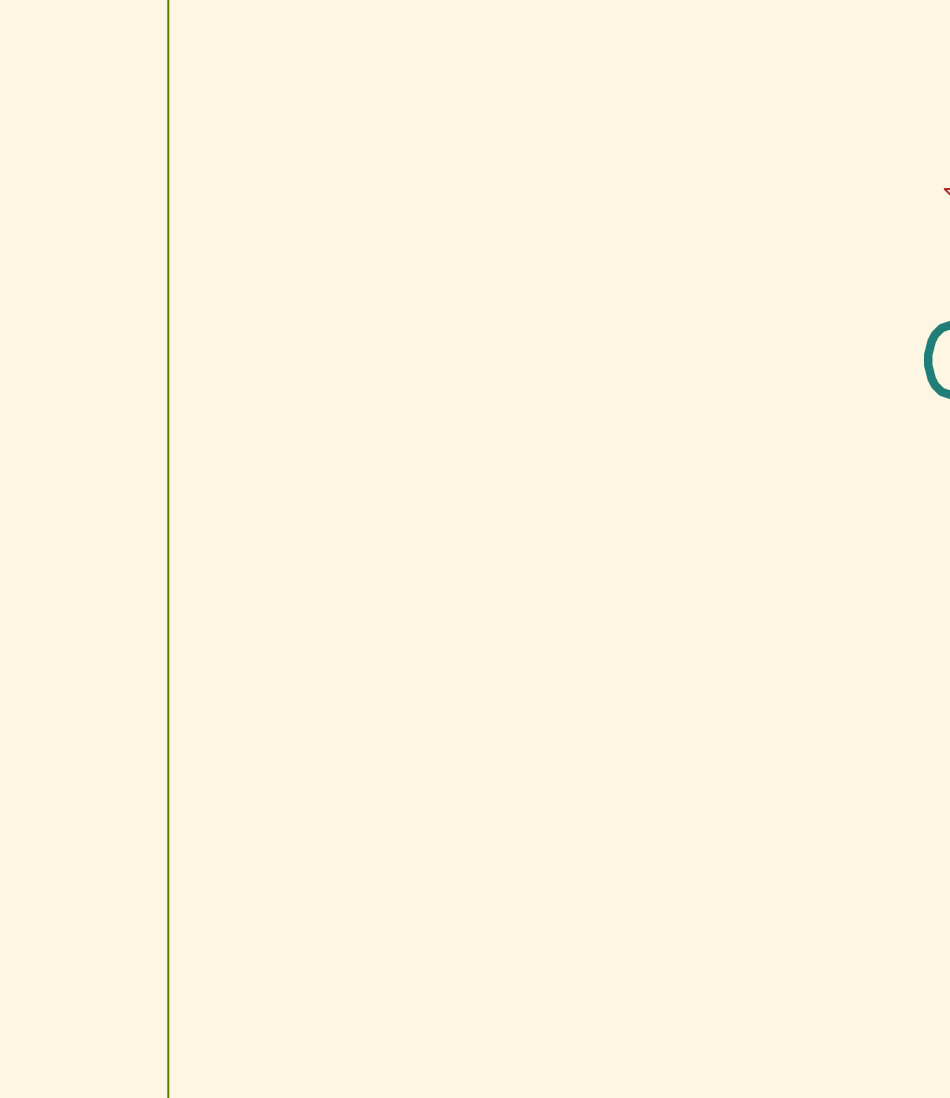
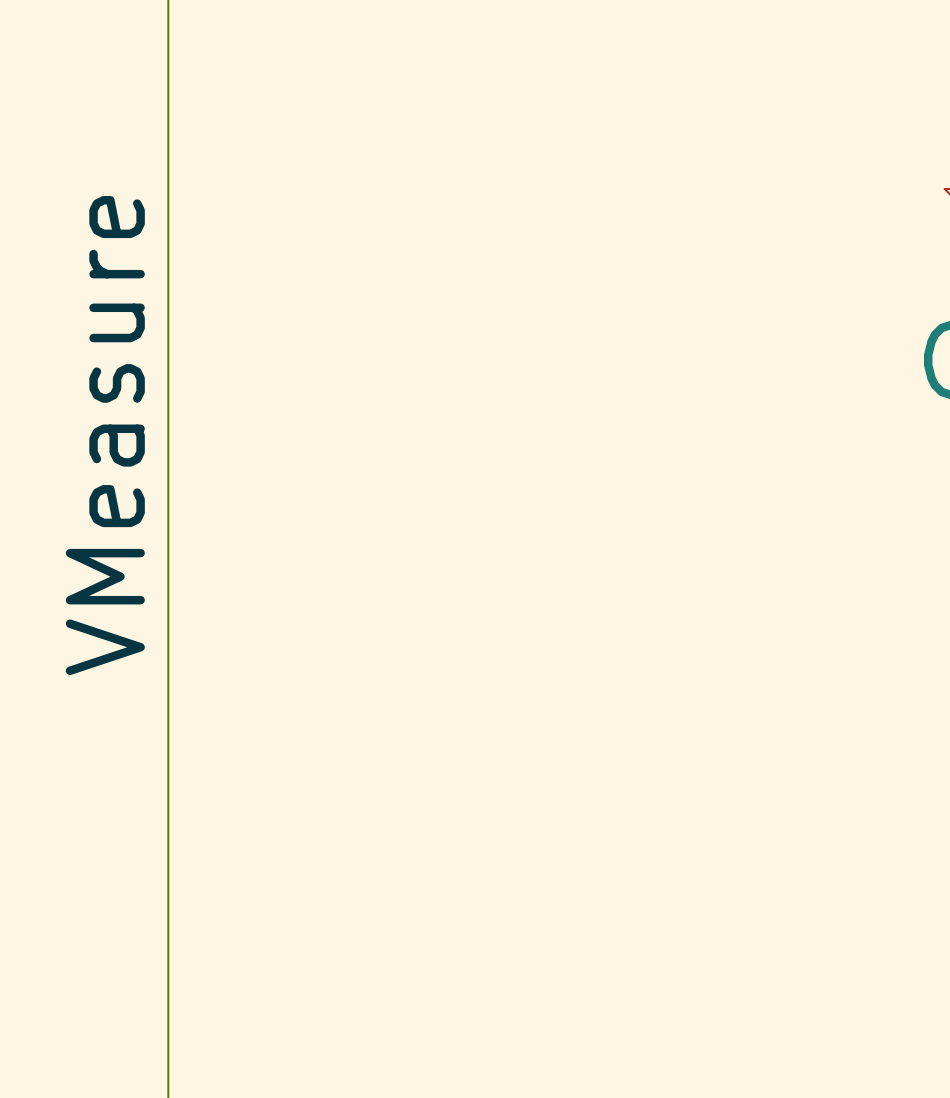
label: none -> VMeasure (105, 435)

